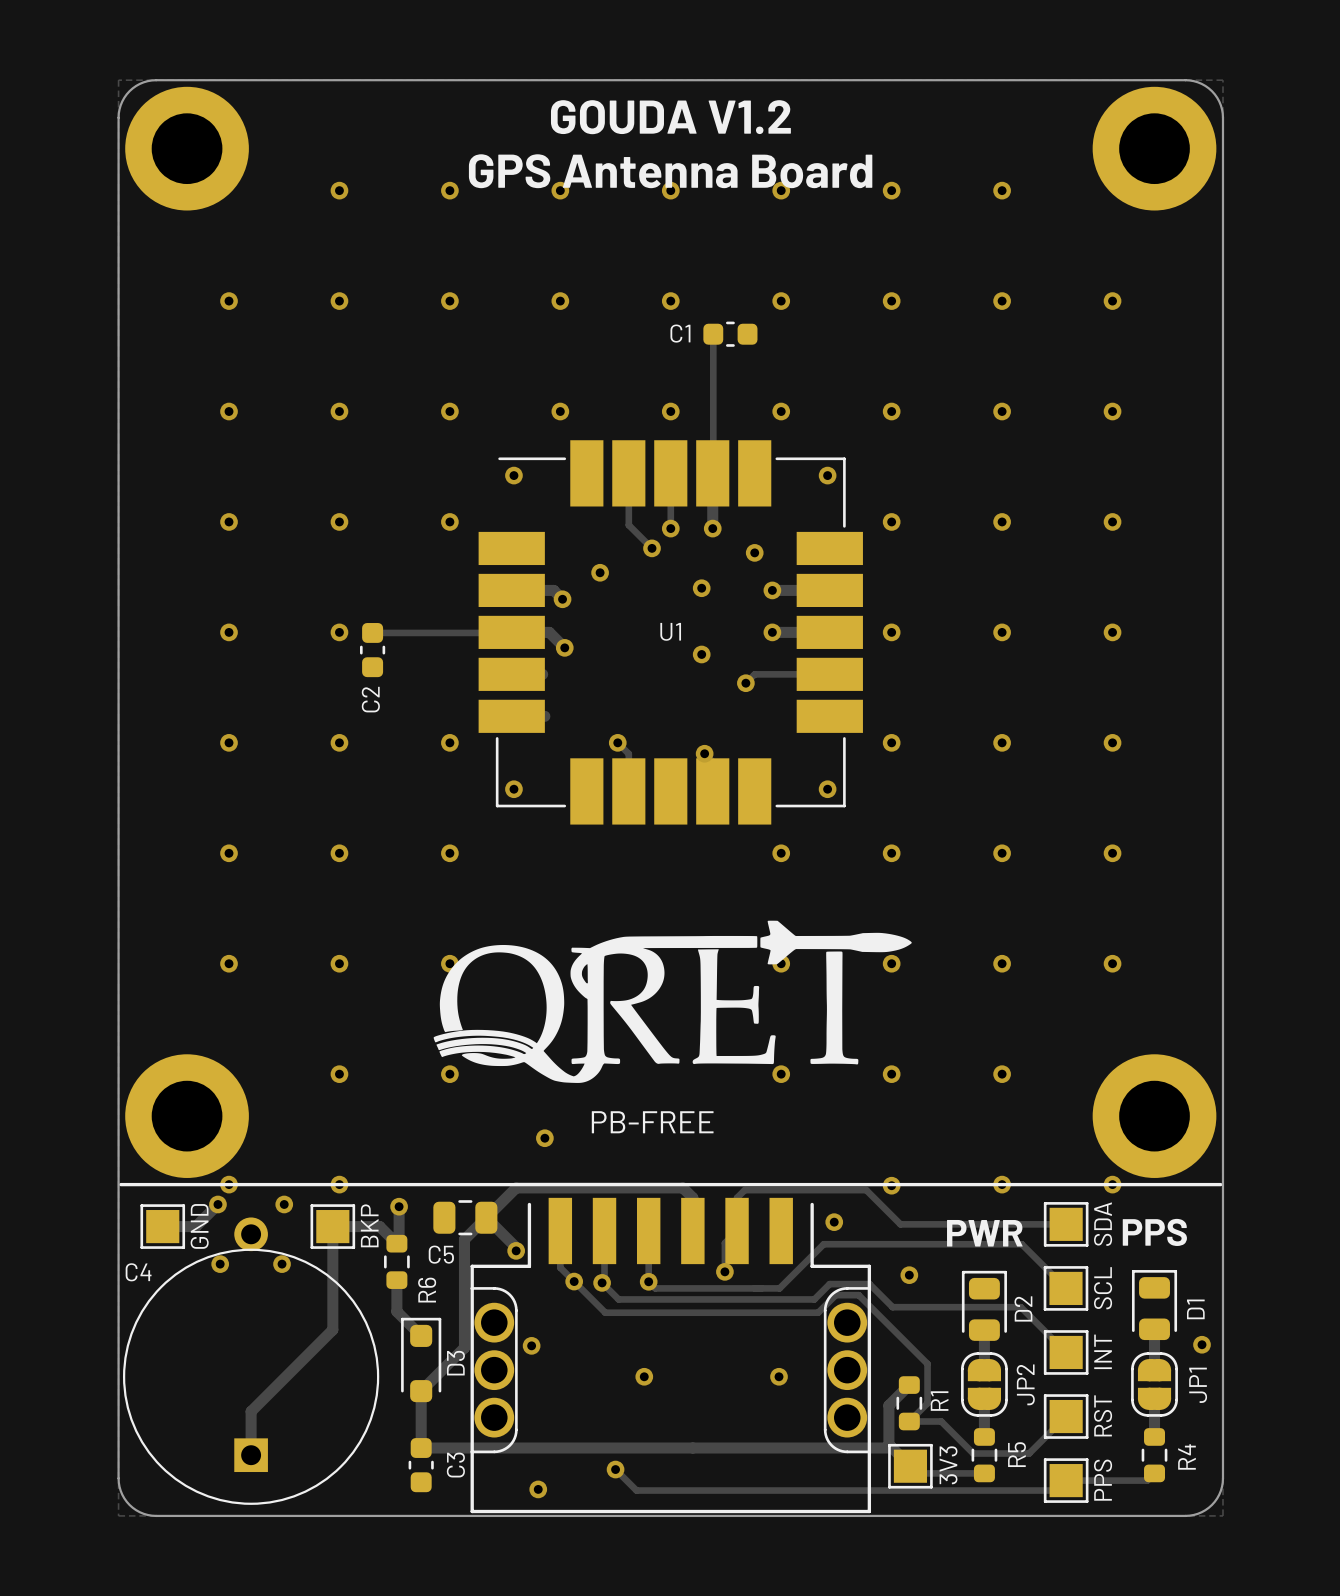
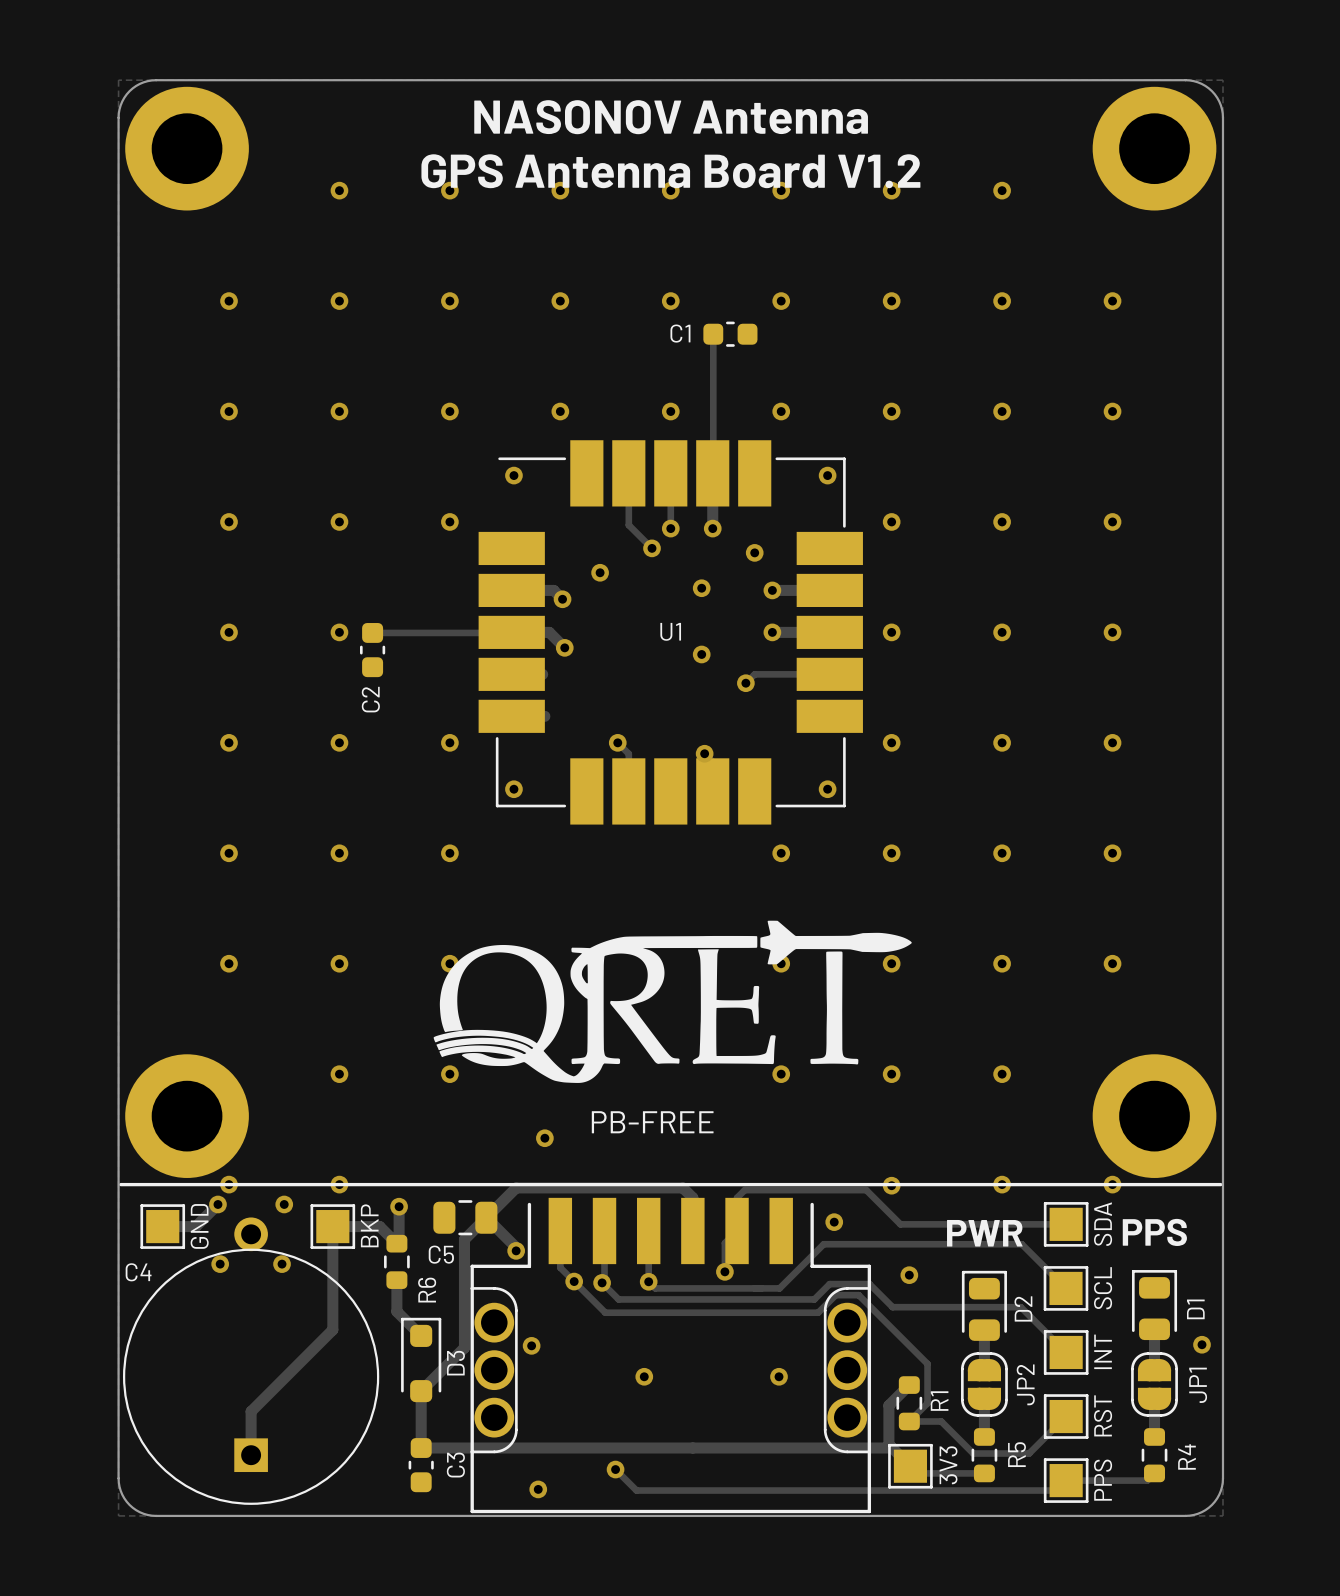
text: GOUDA V1.2 (670, 117) -> NASONOV Antenna (671, 117)
text: GPS Antenna Board (670, 171) -> GPS Antenna Board V1.2 (670, 171)

